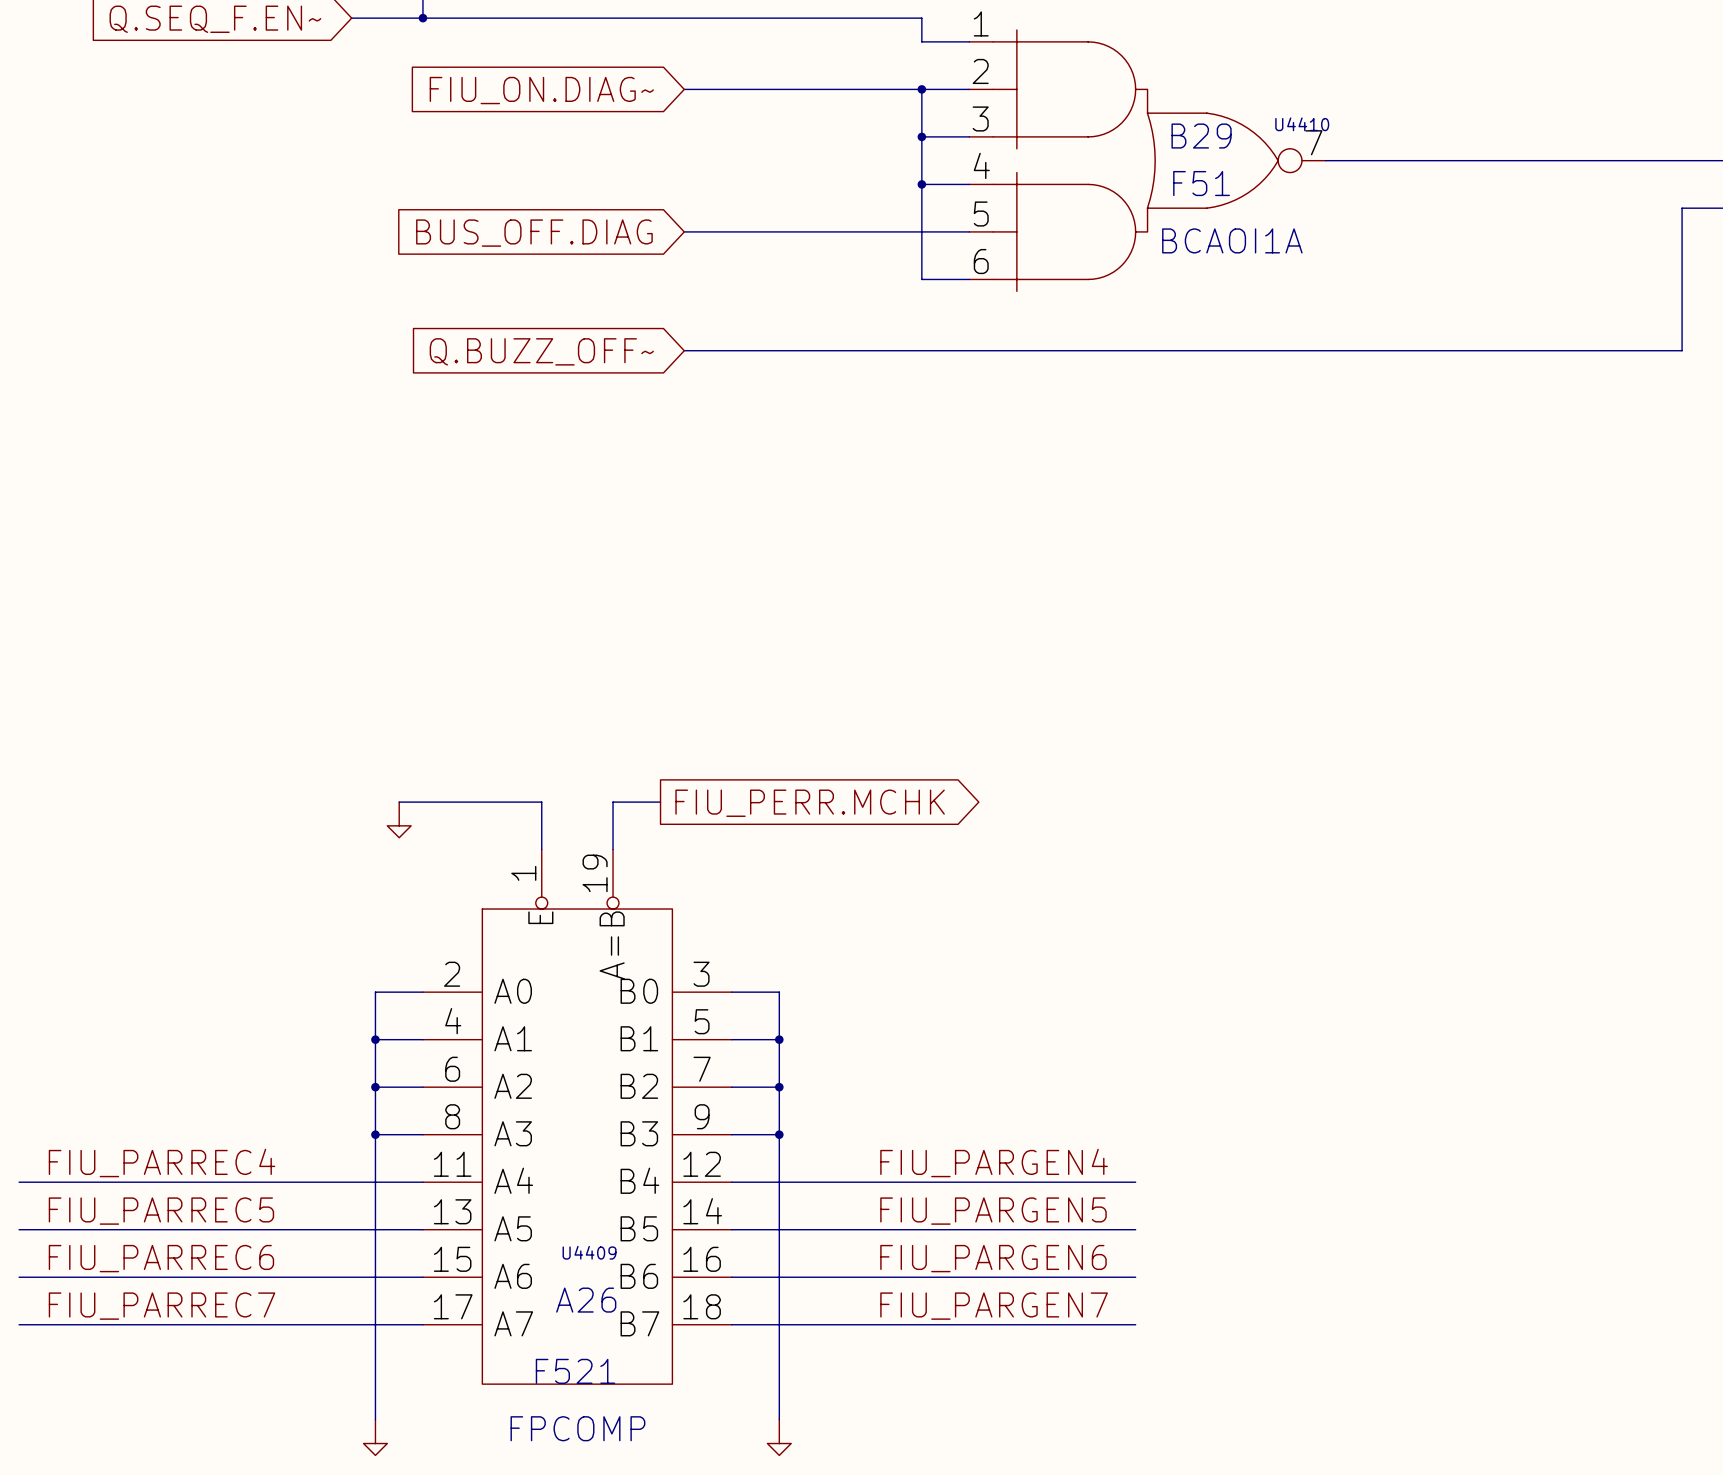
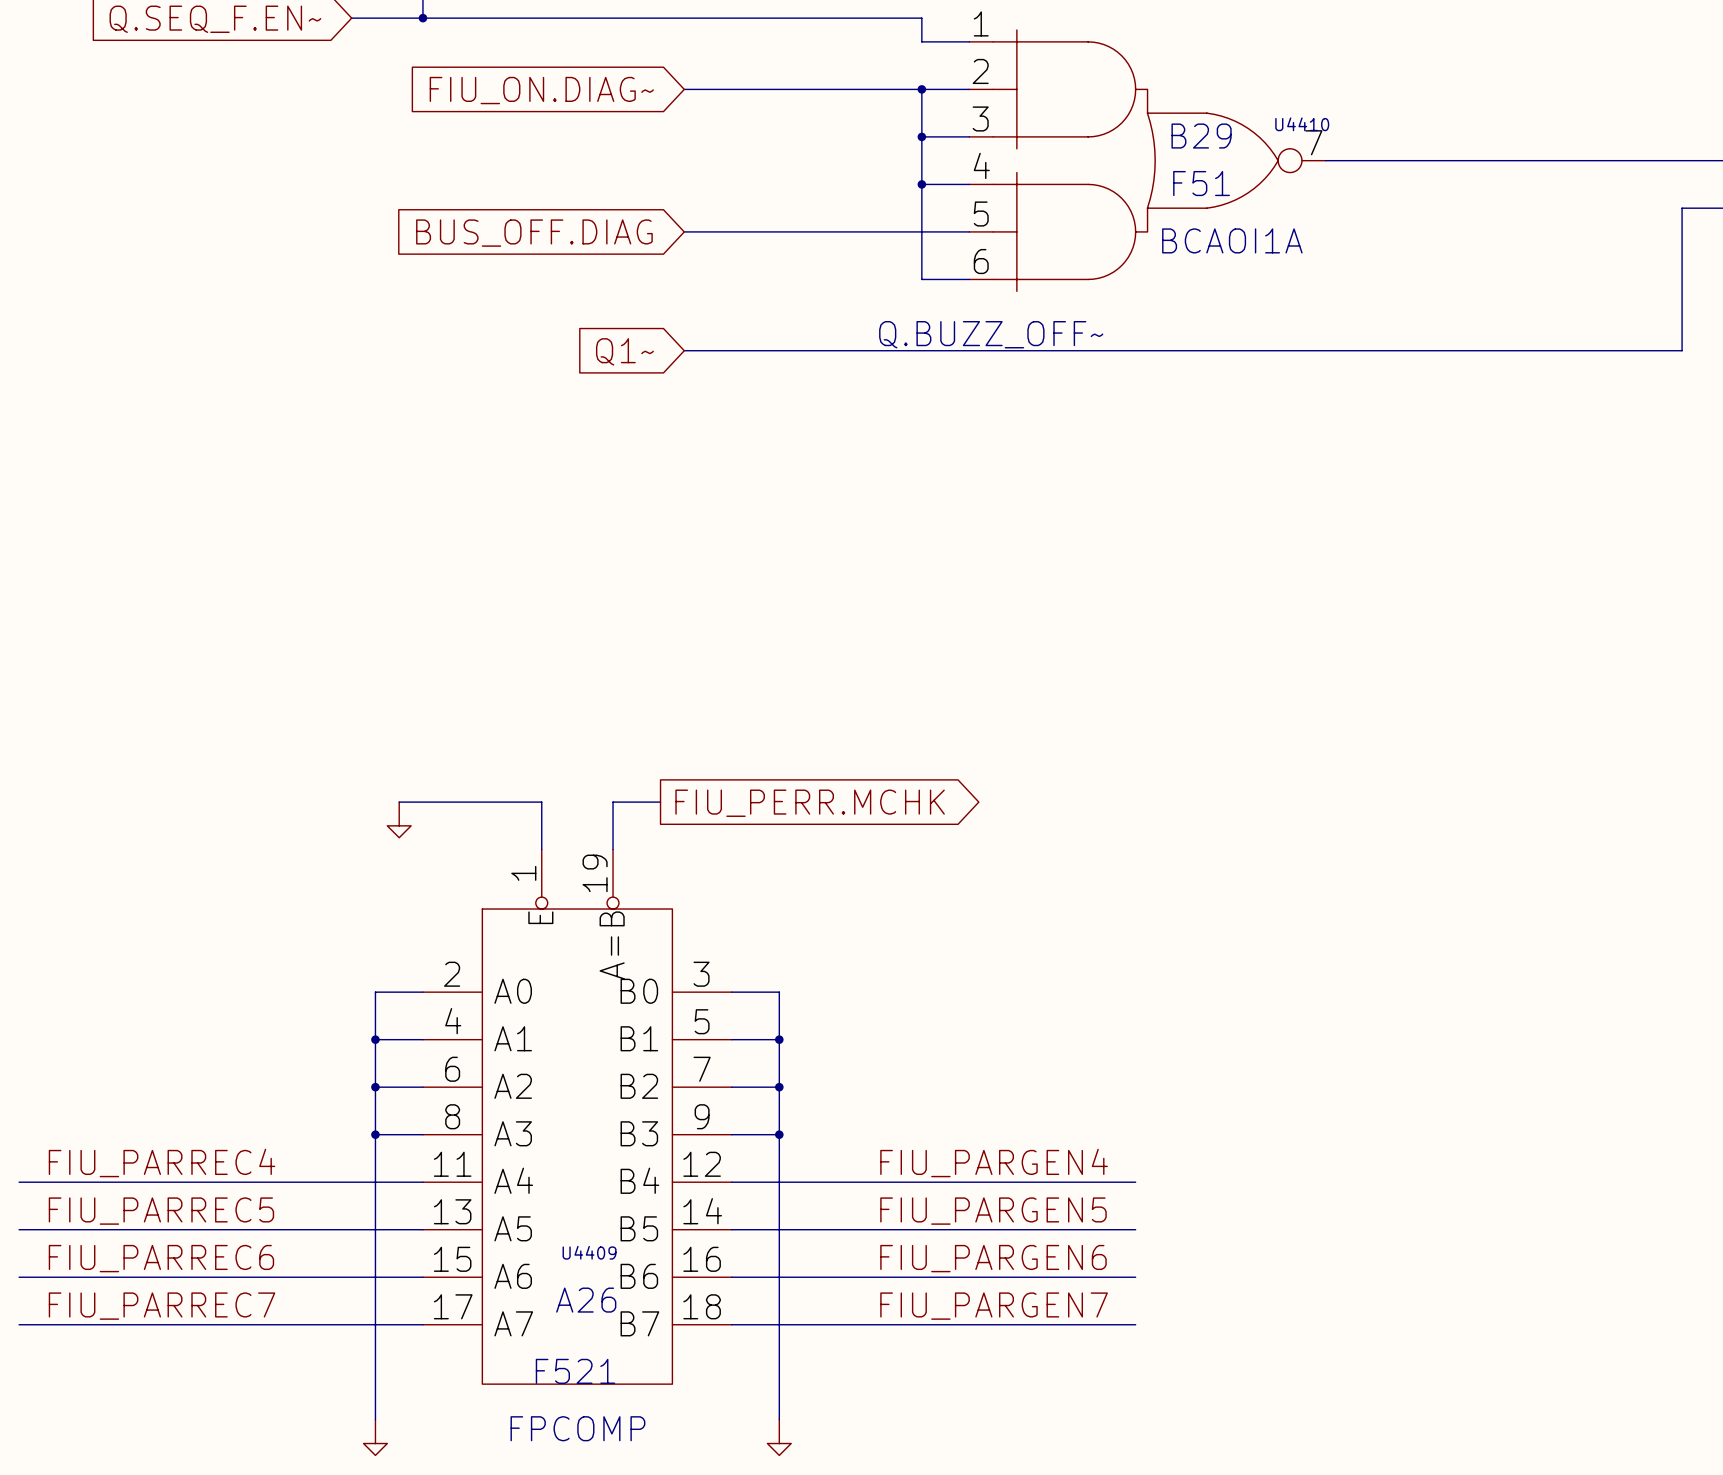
text: none -> Q.BUZZ_OFF~ (991, 334)
global label: Q.BUZZ_OFF~ (541, 351) -> Q1~ (624, 351)

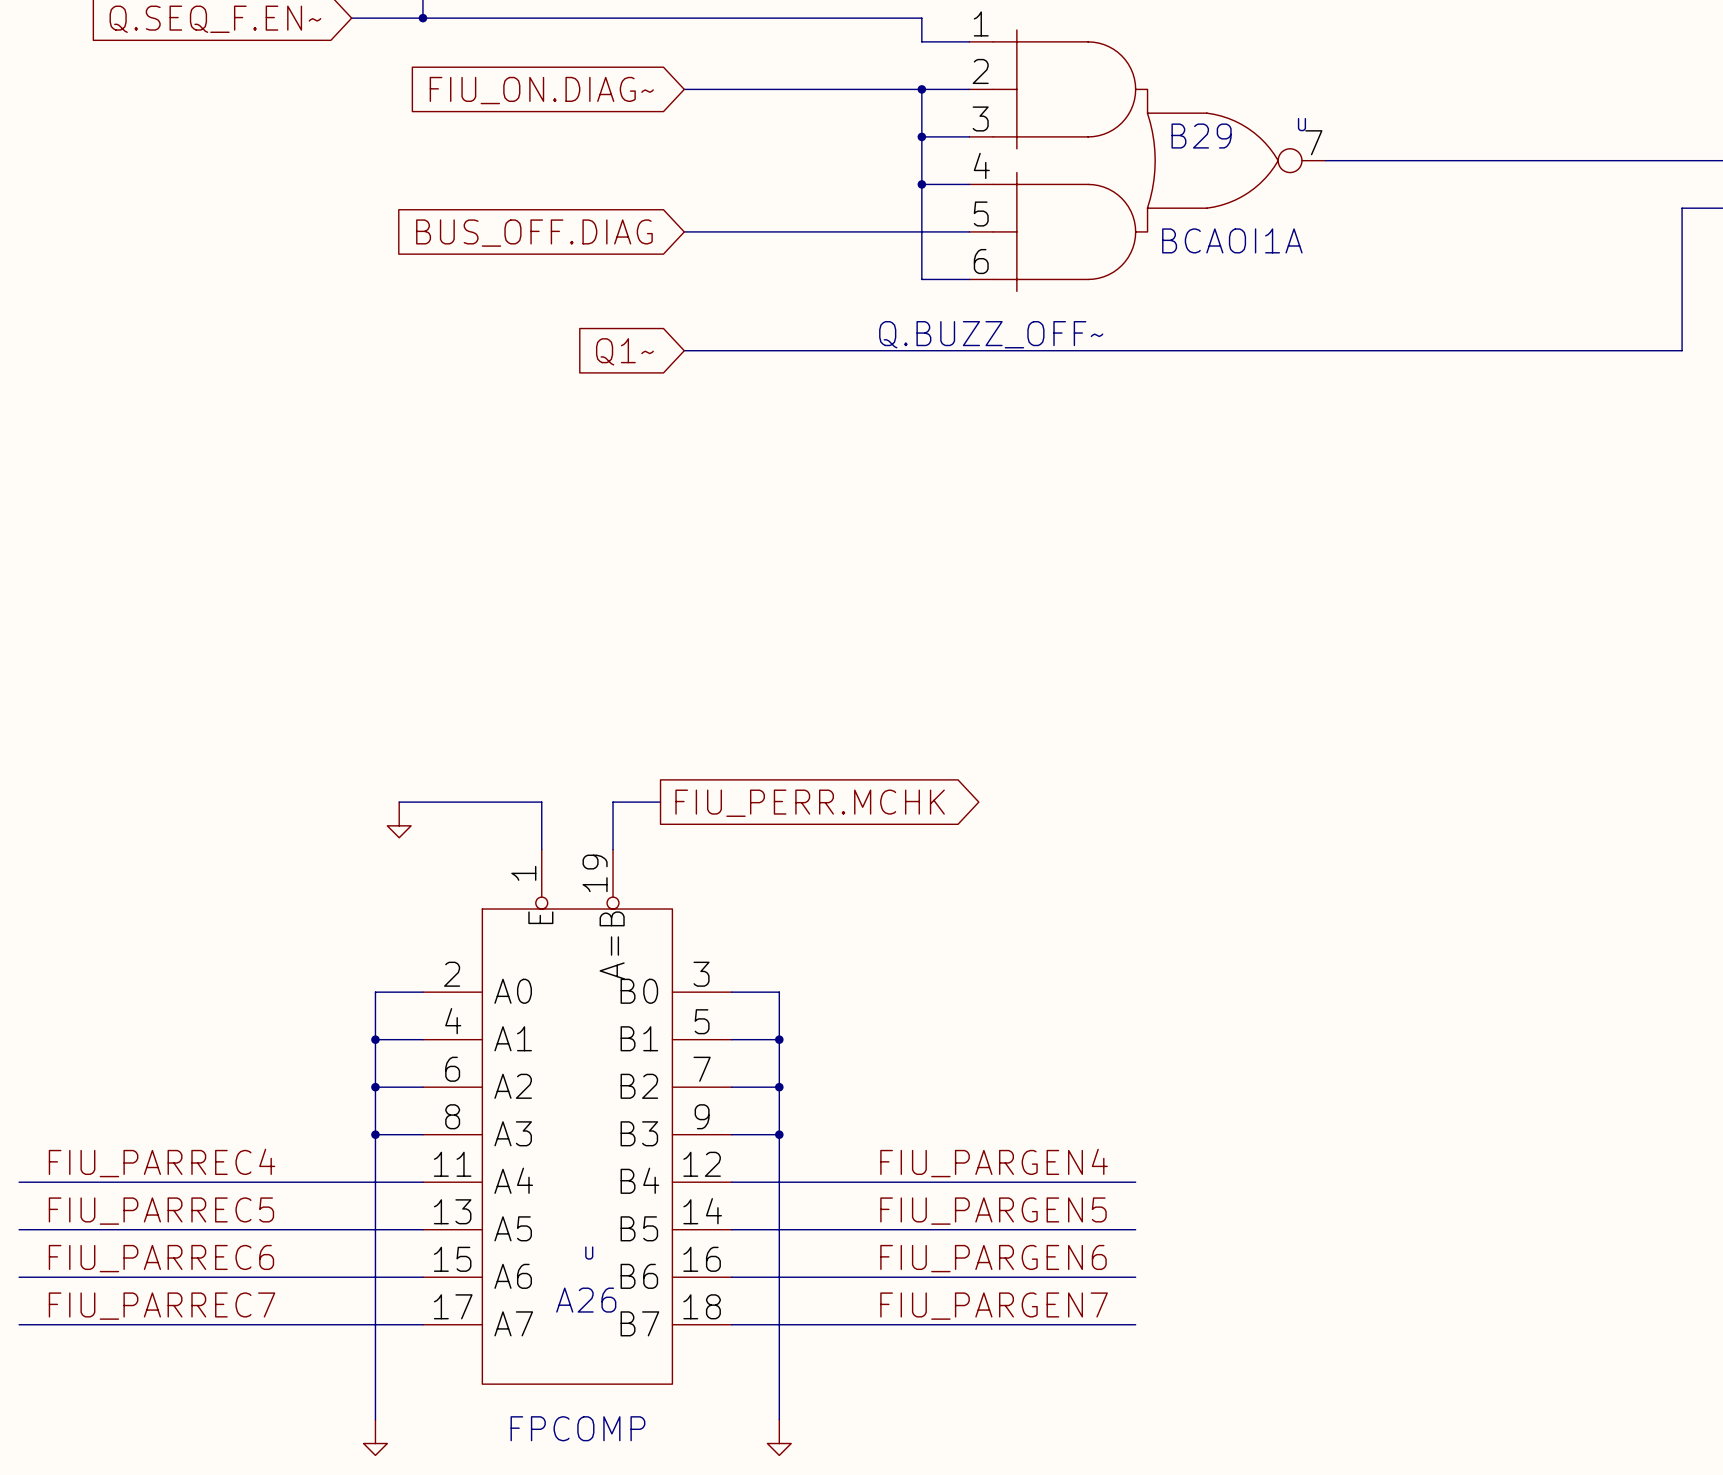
U4410 name: U4410 (1302, 124) -> U (1301, 124)
U4410 value: F51 (1201, 183) -> none
U4409 name: U4409 (589, 1252) -> U (589, 1253)
U4409 value: F521 (575, 1371) -> none

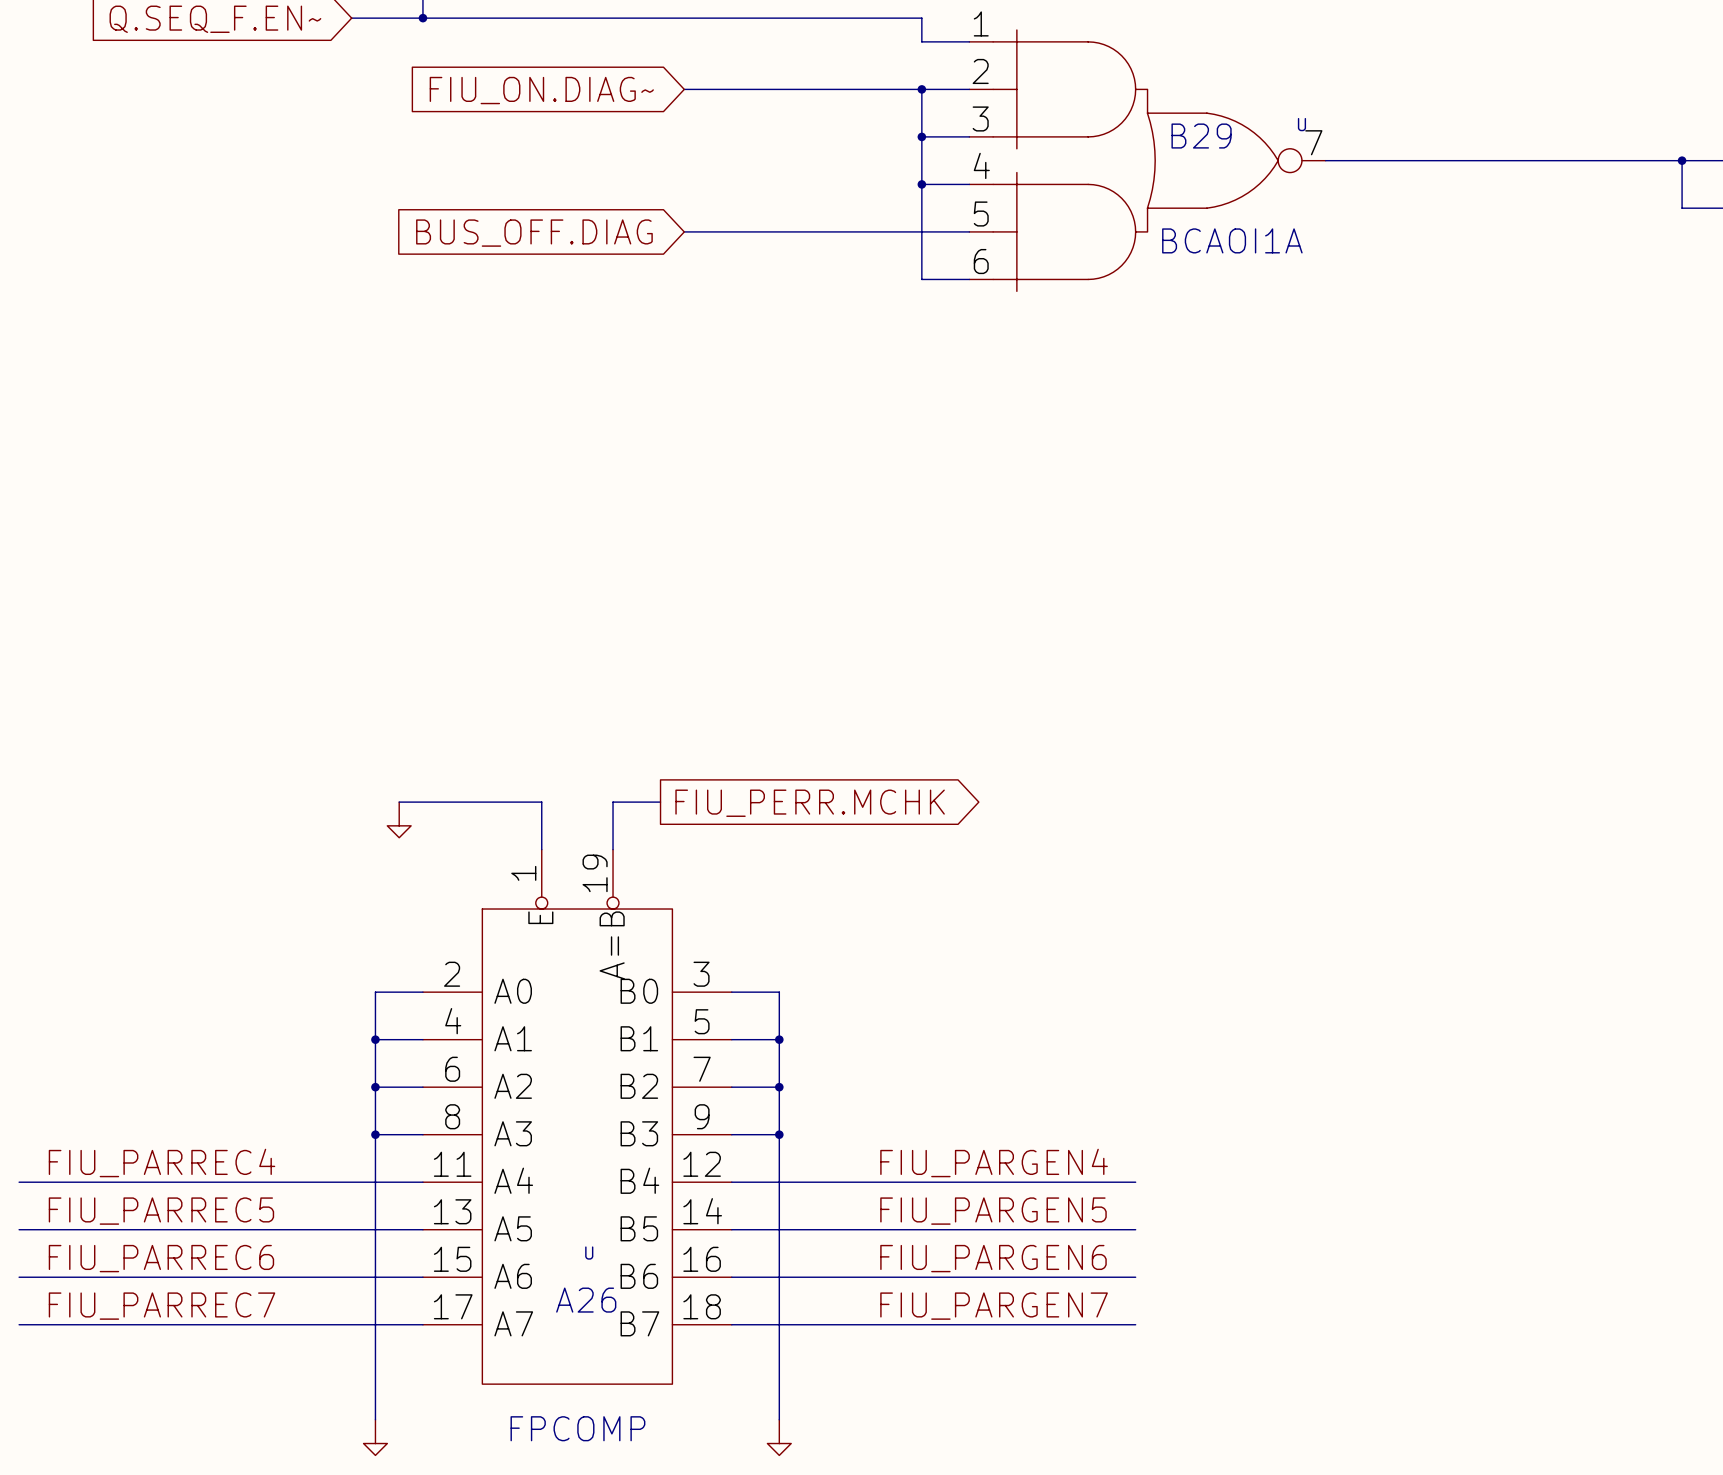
junction: none -> (1682, 160)
wire: (1682, 208) (1682, 350) (684, 350) -> (1682, 208) (1682, 160)
text: Q.BUZZ_OFF~ (991, 334) -> none
global label: Q1~ (624, 351) -> none

